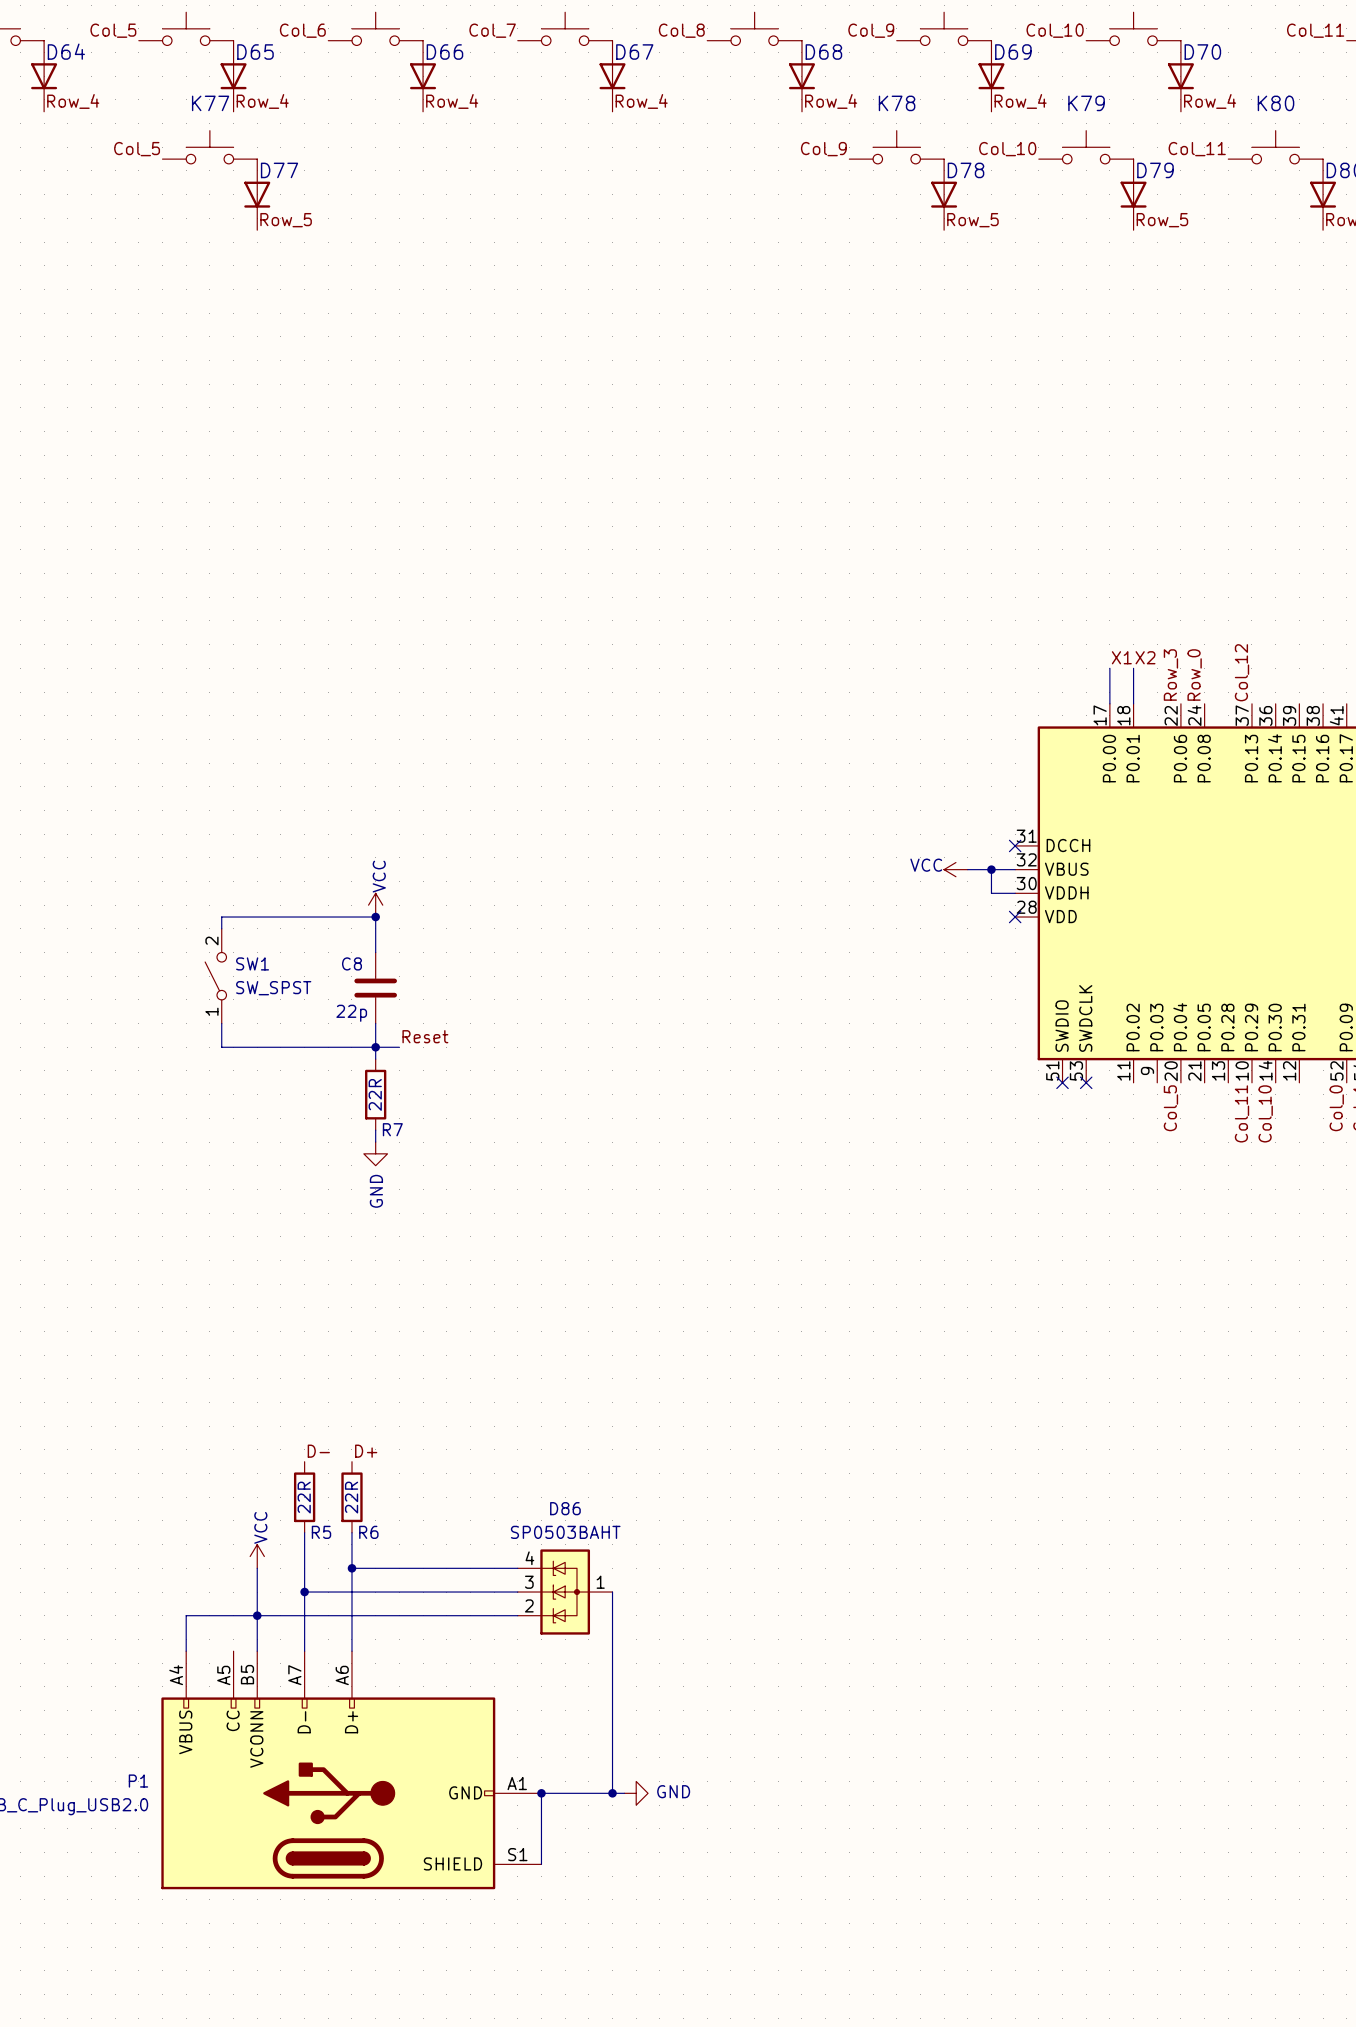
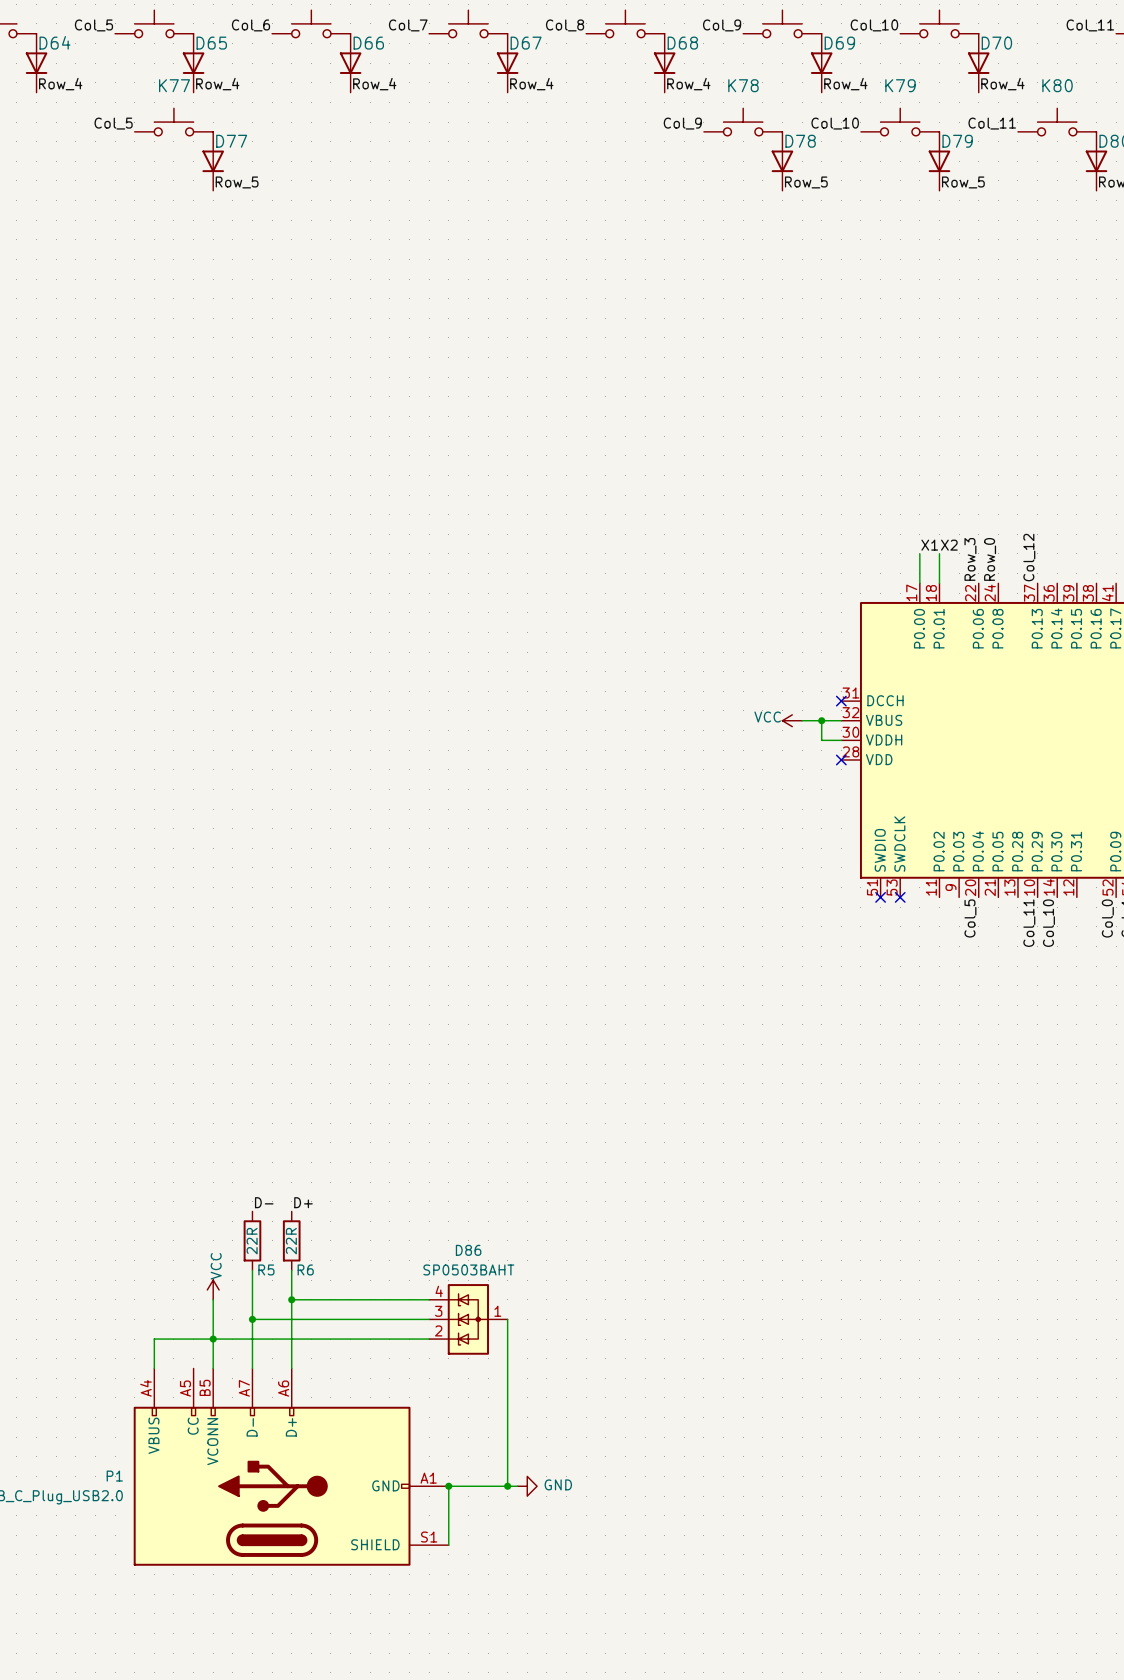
power symbol: VCC (375, 905) -> none
junction: (375, 917) -> none
wire: (221, 928) (221, 917) (375, 917) (375, 952) -> none
SW1: SW_SPST (215, 976) -> none
C8: 22p (375, 988) -> none
wire: (221, 1023) (221, 1047) (399, 1047) -> none
wire: (375, 1023) (375, 1059) -> none
label: Reset (425, 1036) -> none
junction: (375, 1047) -> none
R7: 22R (375, 1094) -> none
wire: (375, 1130) (375, 1142) -> none
power symbol: GND (375, 1153) -> none

